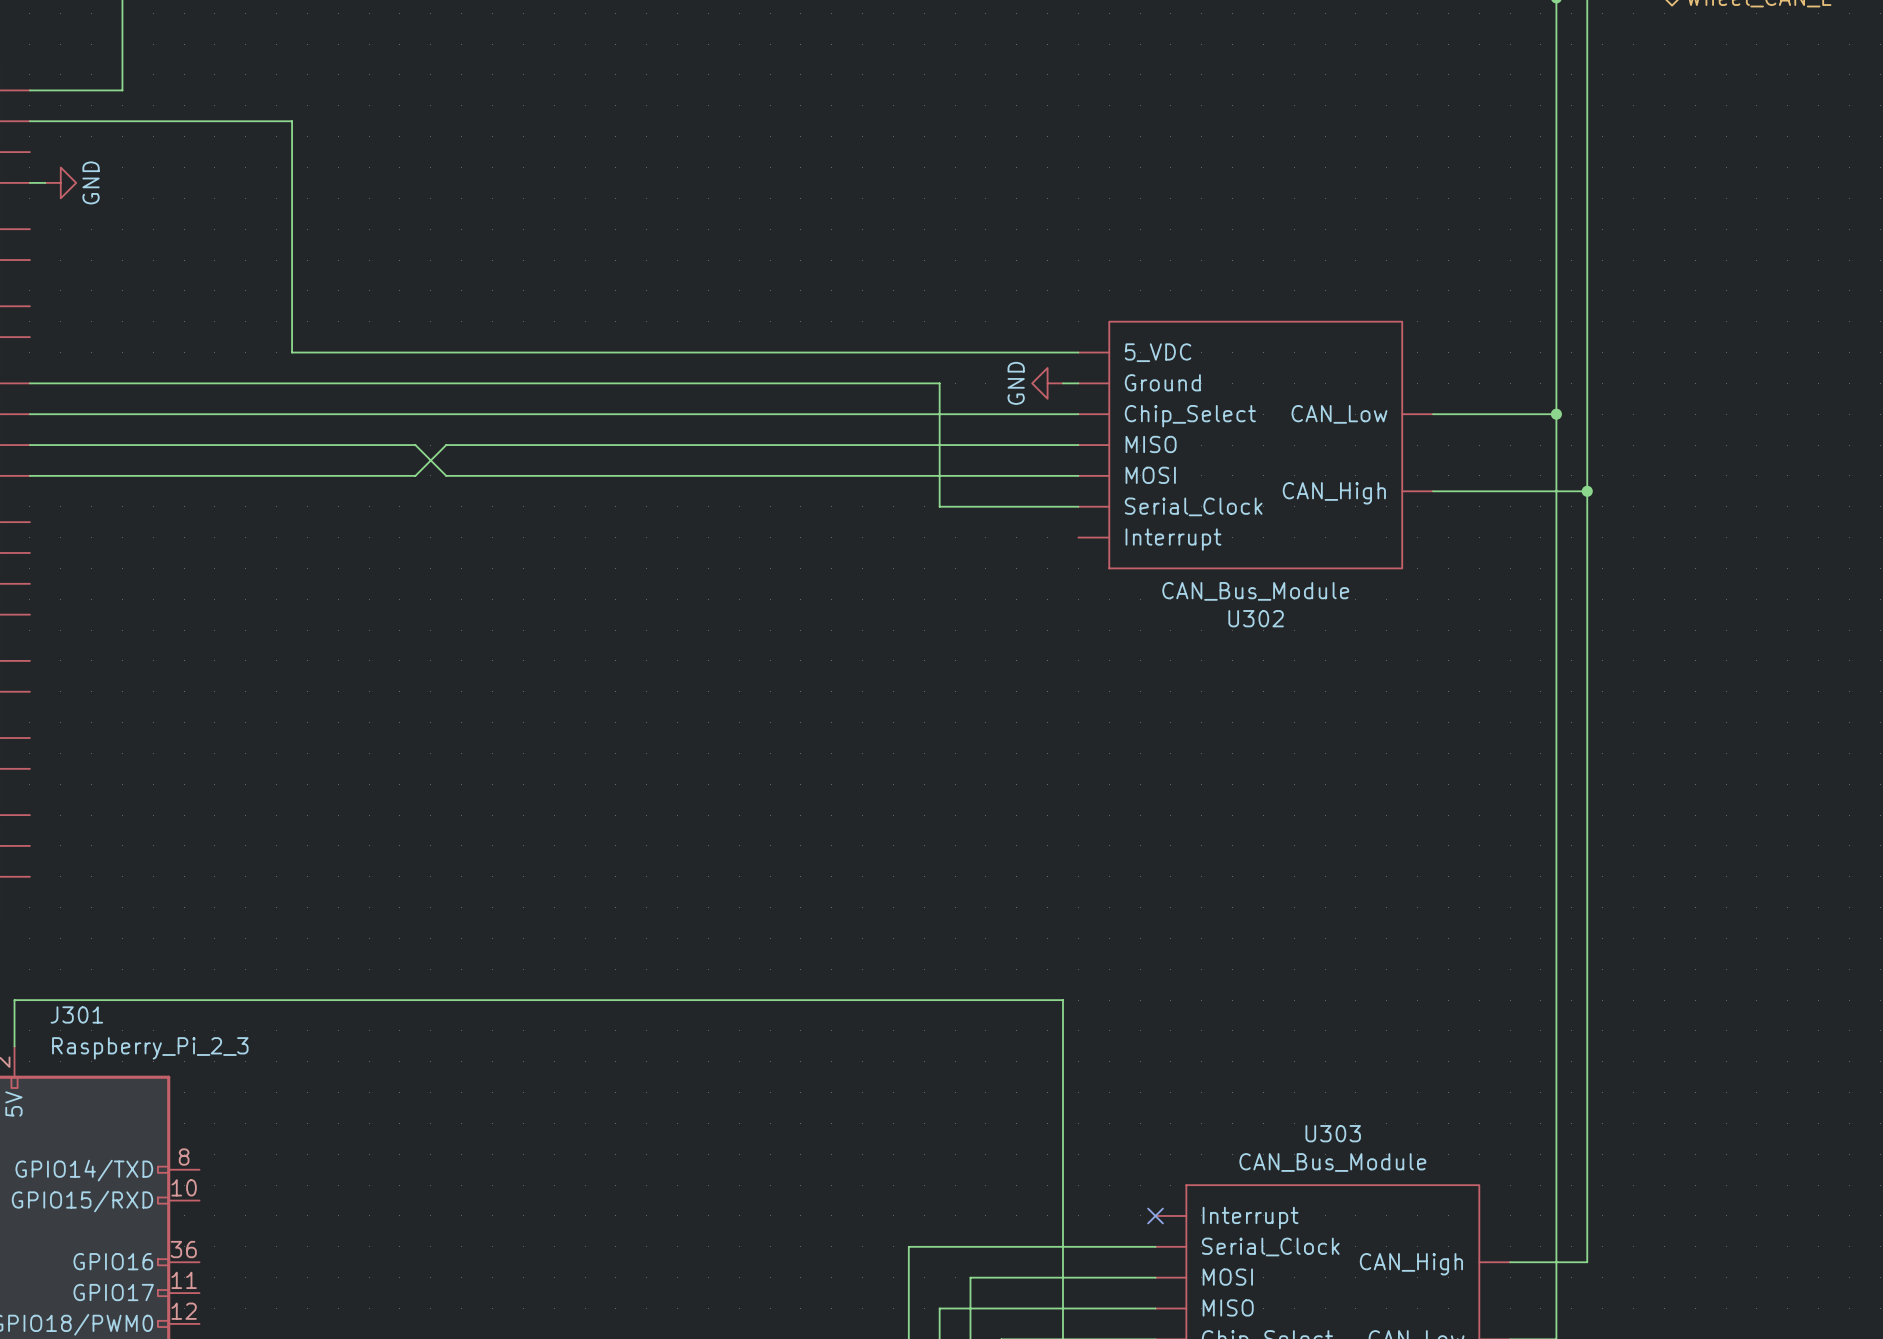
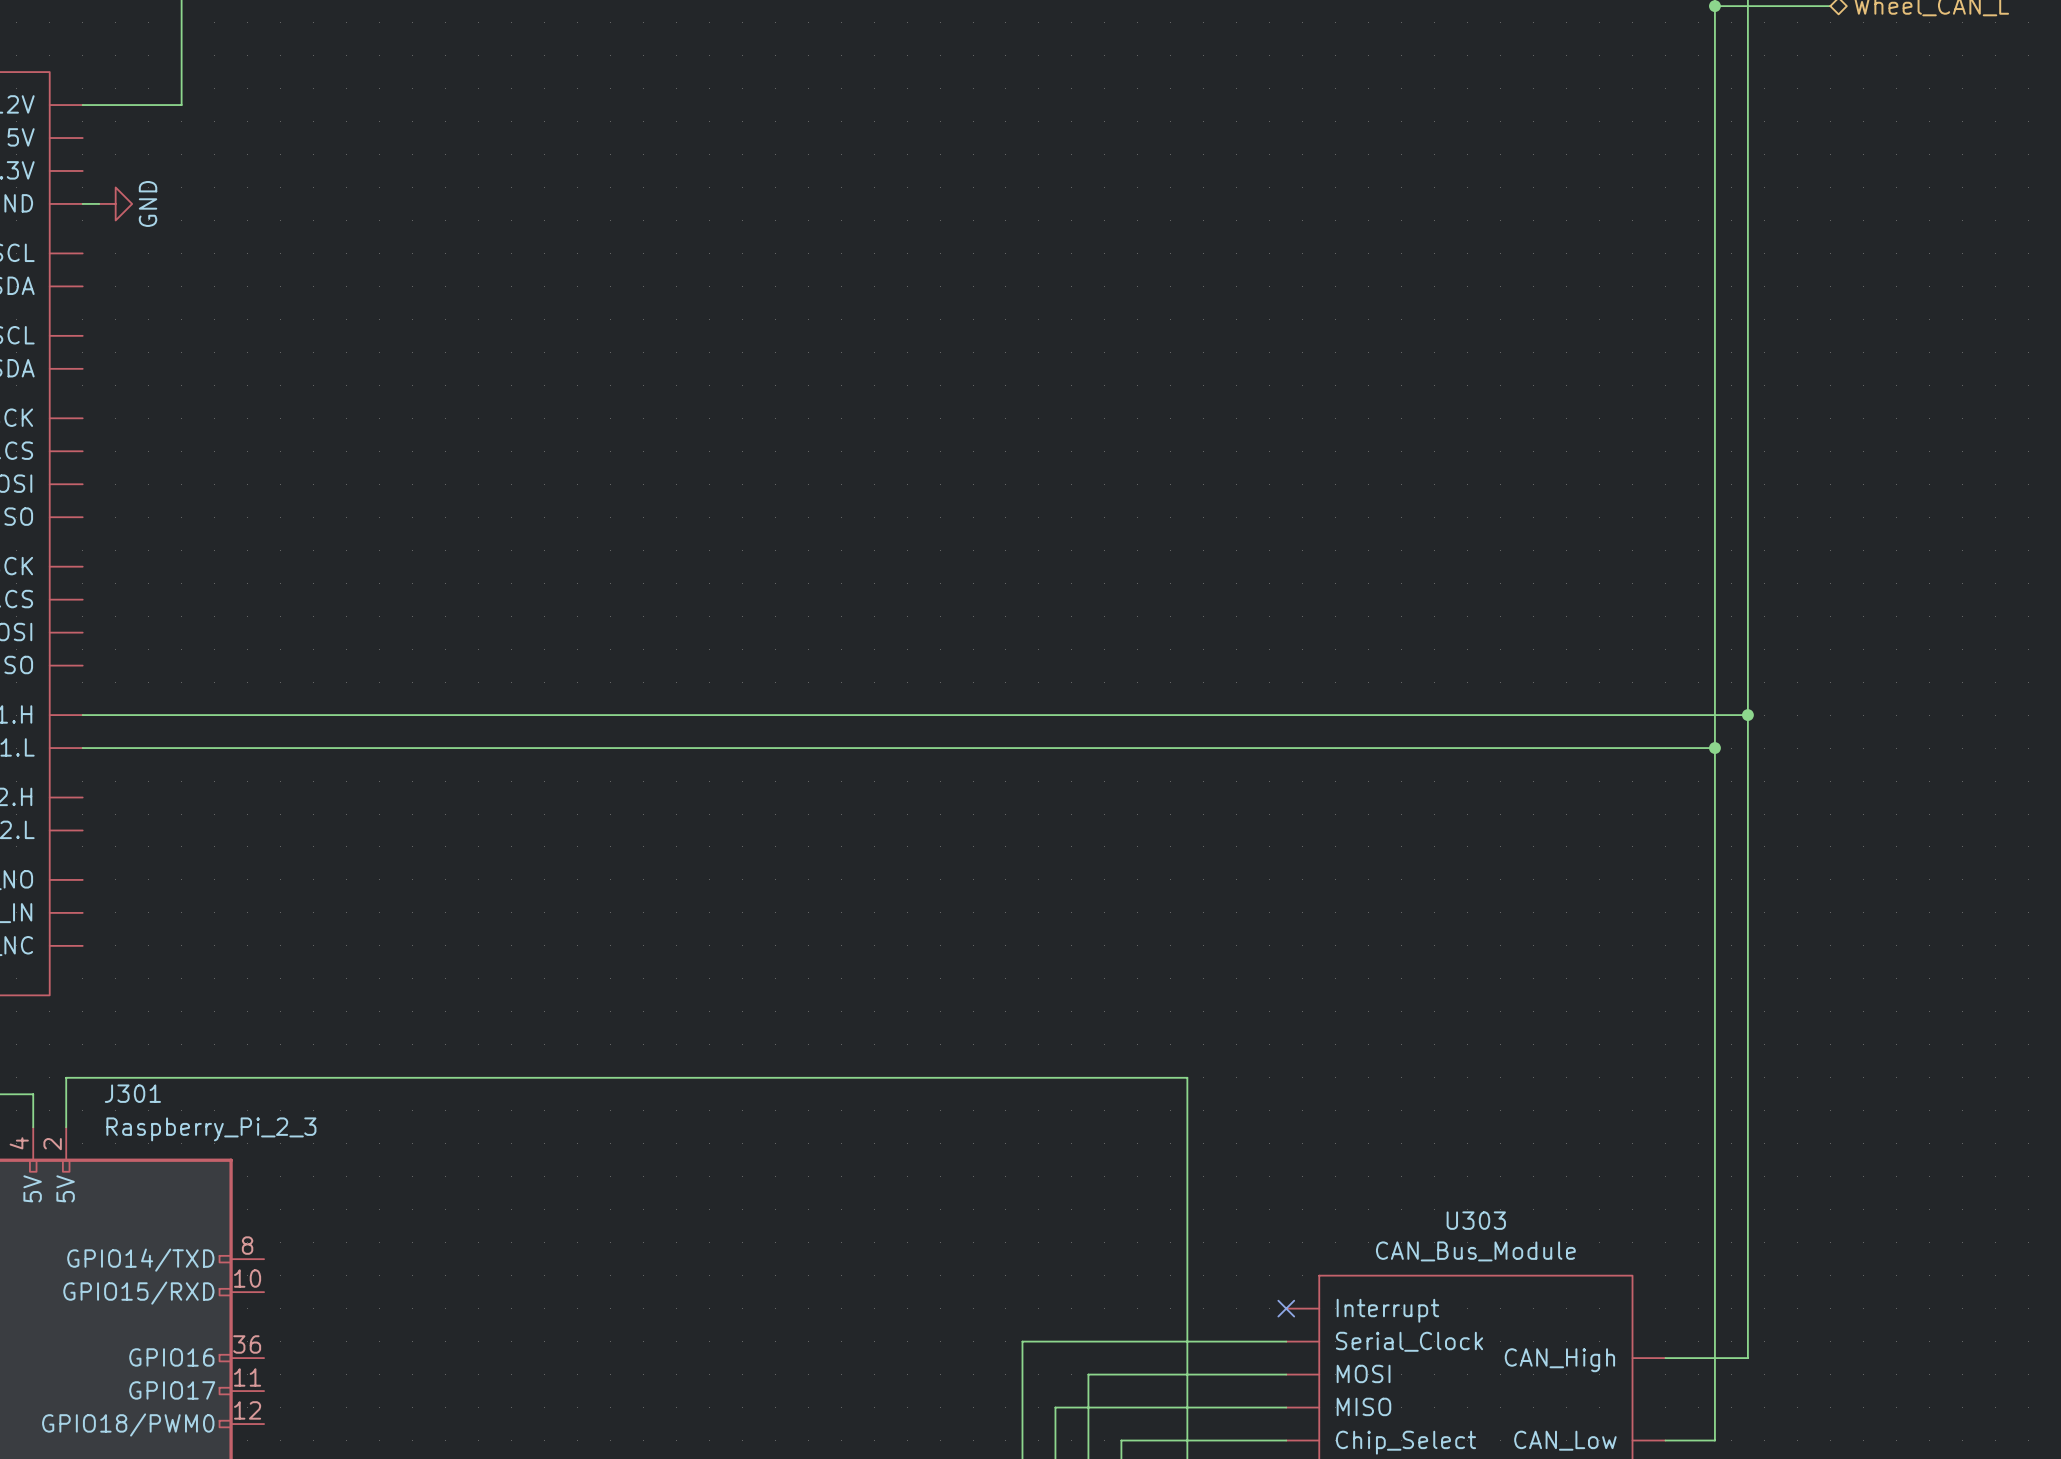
wire: (29, 121) (292, 121) (292, 352) (1078, 352) -> none
wire: (29, 383) (939, 383) (939, 506) (1078, 506) -> none
power symbol: GND (1047, 383) -> none
wire: (1063, 383) (1078, 383) -> none
wire: (29, 414) (1078, 414) -> none
wire: (1433, 414) (1556, 414) -> none
junction: (1556, 414) -> none
wire: (29, 445) (415, 445) (446, 475) (1078, 475) -> none
wire: (1078, 445) (446, 445) (415, 475) (29, 475) -> none
U302: CAN_Bus_Module (1255, 445) -> none
wire: (1433, 491) (1587, 491) -> none
junction: (1587, 491) -> none
wire: none -> (82, 715) (1747, 715)
junction: none -> (1747, 715)
wire: none -> (82, 748) (1714, 748)
junction: none -> (1714, 748)

